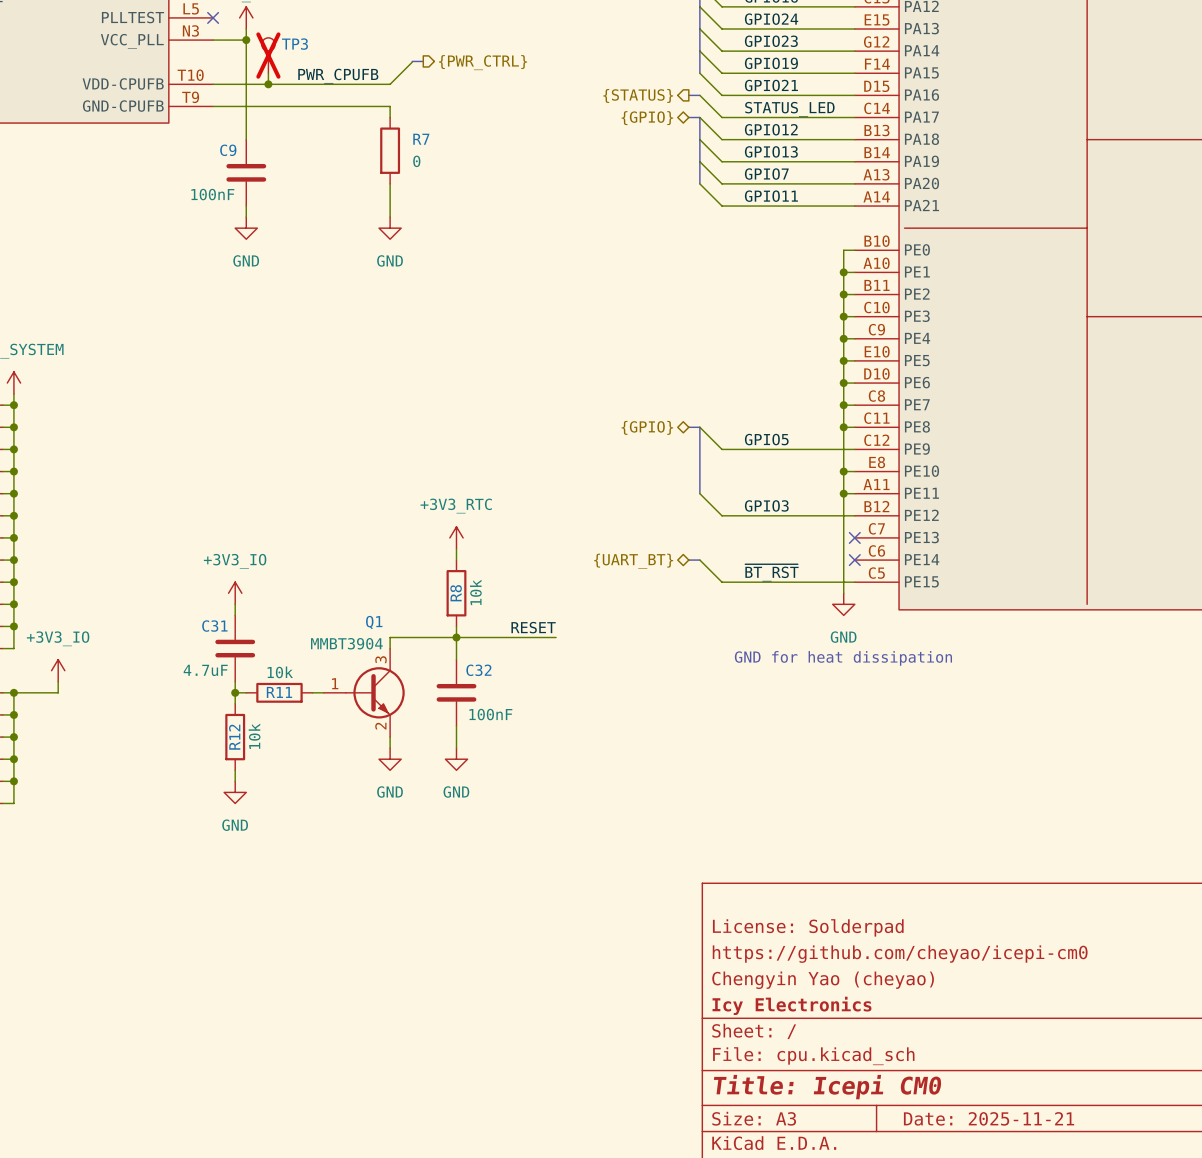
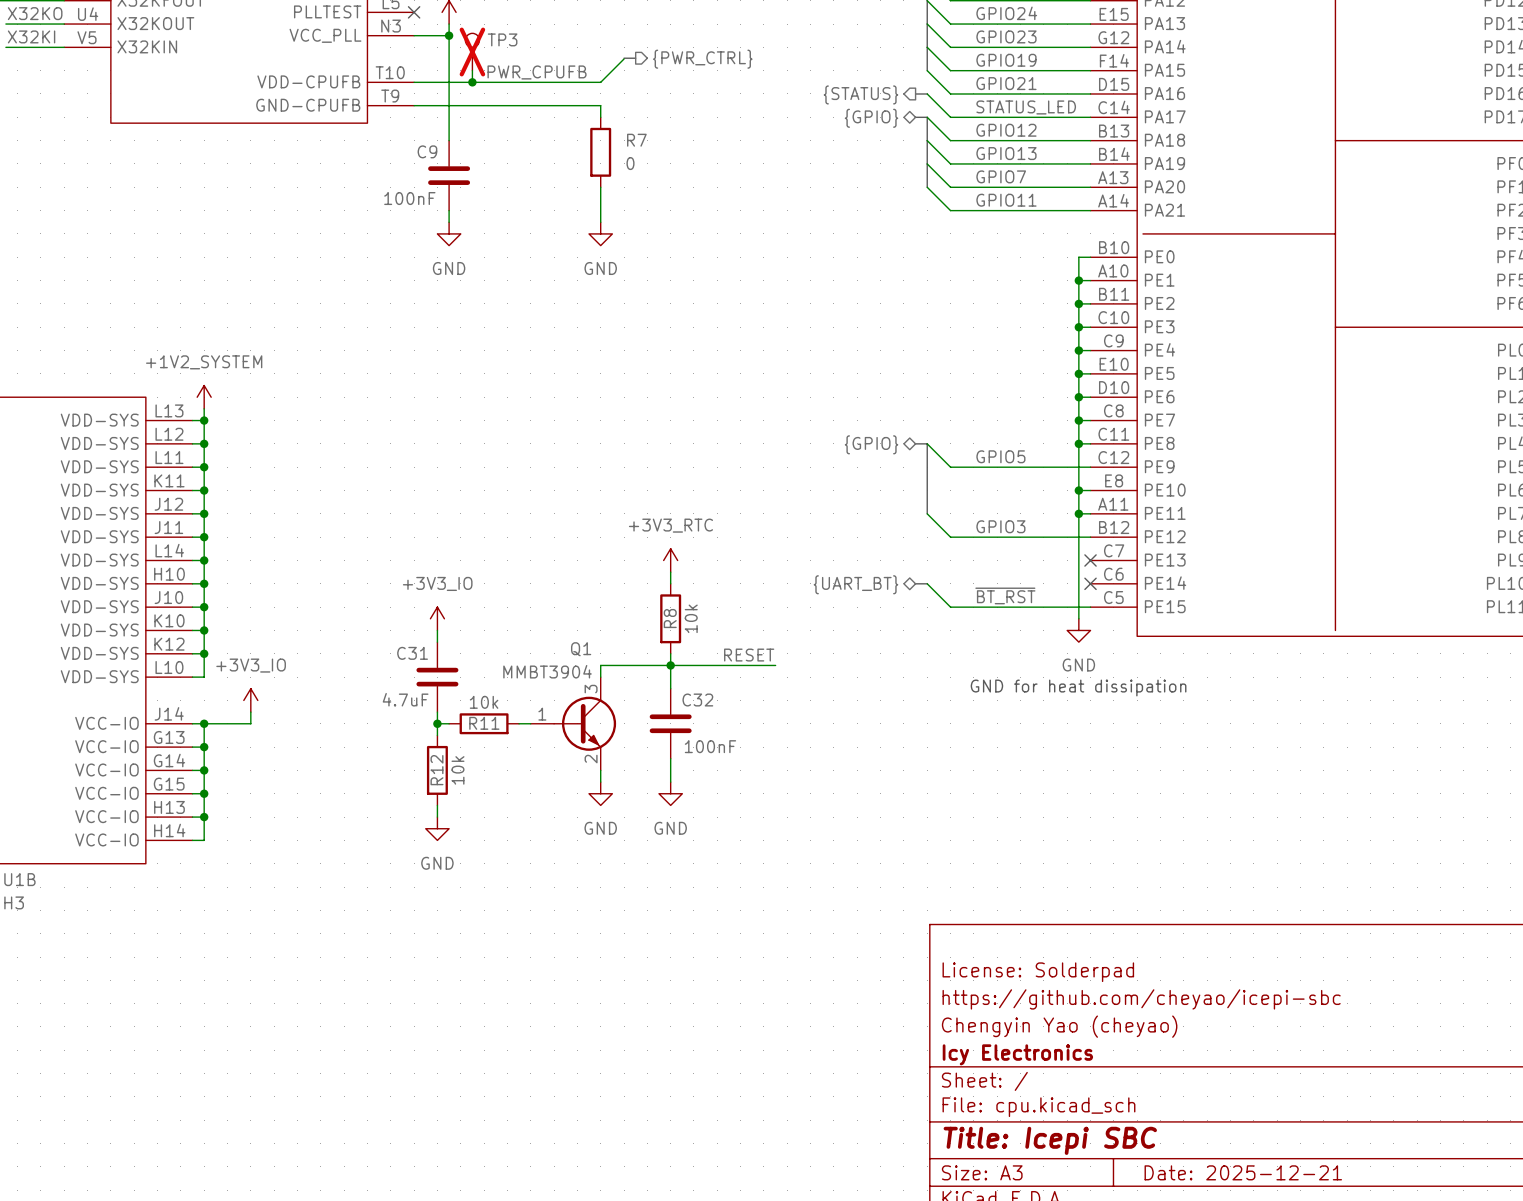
title block: https://github.com/cheyao/icepi-cm0 (900, 954) -> https://github.com/cheyao/icepi-sbc (1141, 999)
title block: Title: Icepi CM0 (827, 1087) -> Title: Icepi SBC (1050, 1140)
title block: Date: 2025-11-21 (989, 1118) -> Date: 2025-12-21 (1243, 1172)

